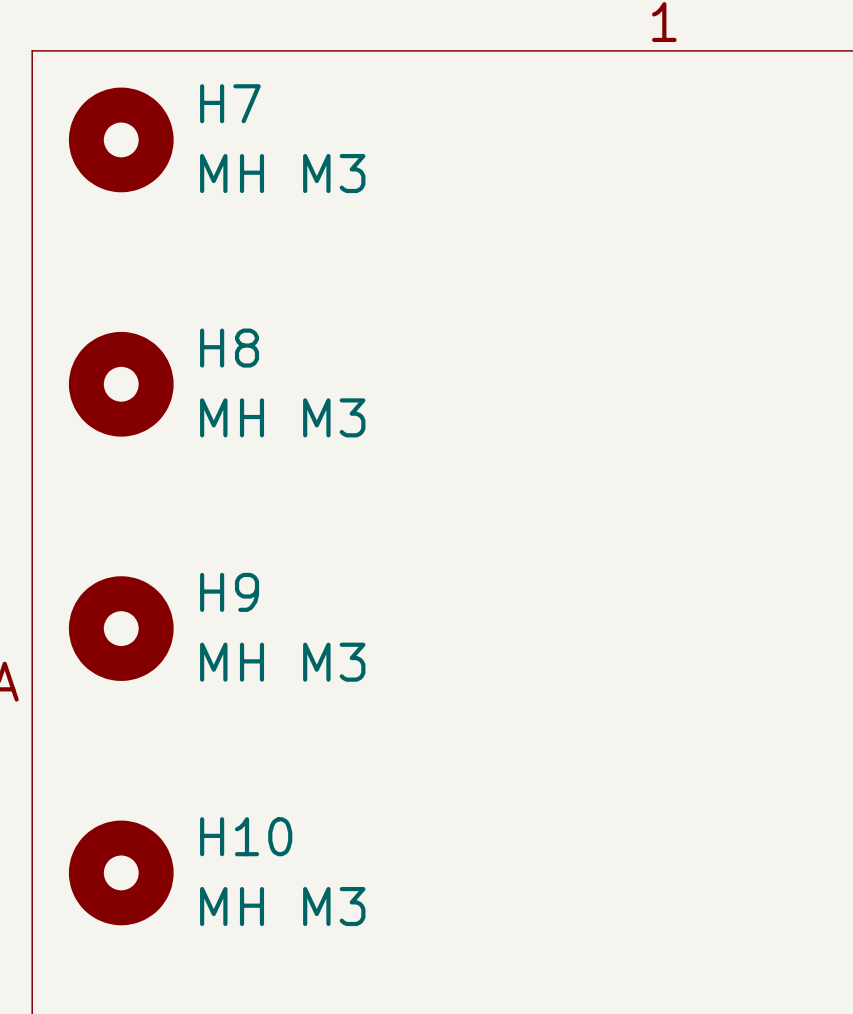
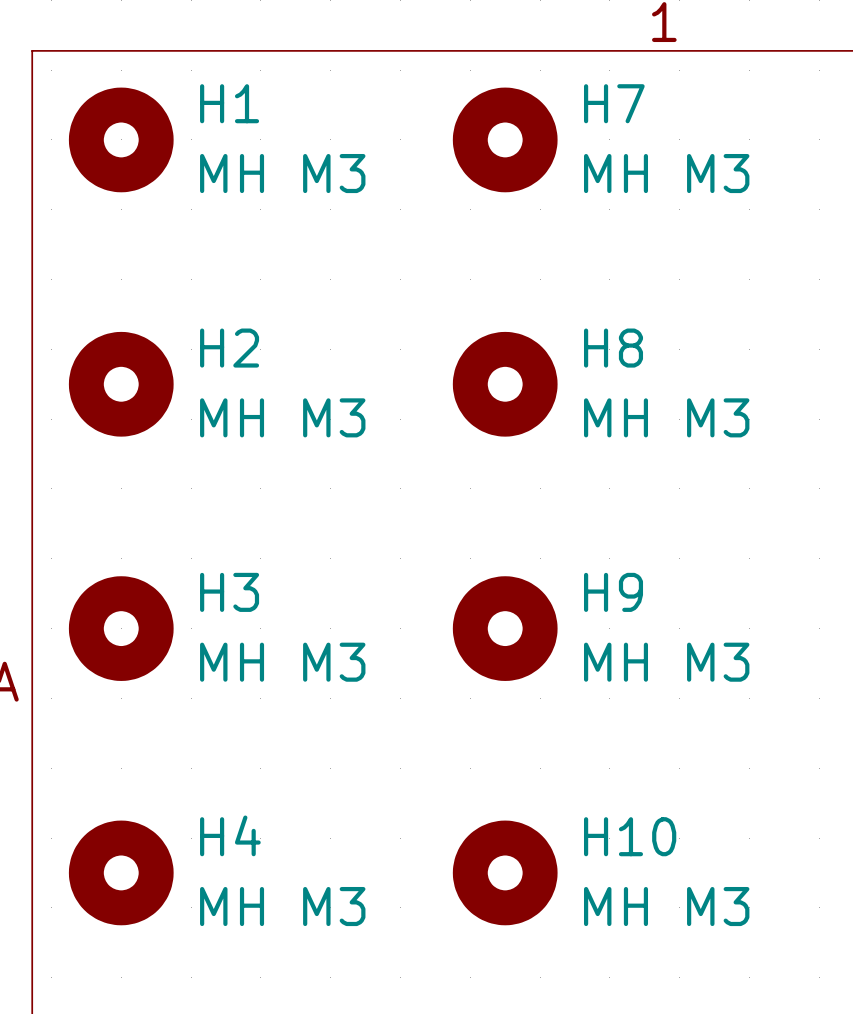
H7 name: H7 (230, 103) -> H1 (229, 103)
H7: none -> MH M3 (505, 139)
H8 name: H8 (229, 348) -> H2 (229, 348)
H8: none -> MH M3 (505, 384)
H9 name: H9 (229, 592) -> H3 (229, 592)
H9: none -> MH M3 (505, 628)
H10 name: H10 (246, 836) -> H4 (230, 835)
H10: none -> MH M3 (505, 872)

